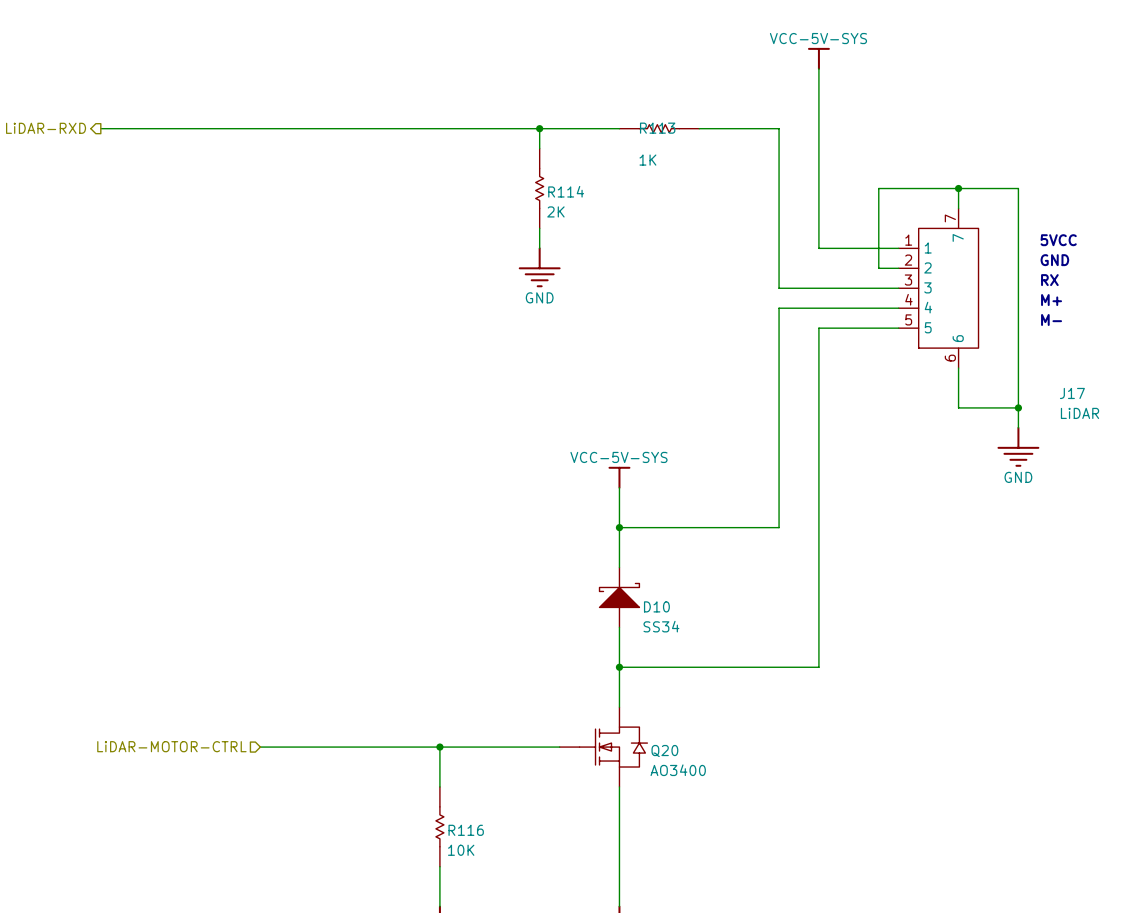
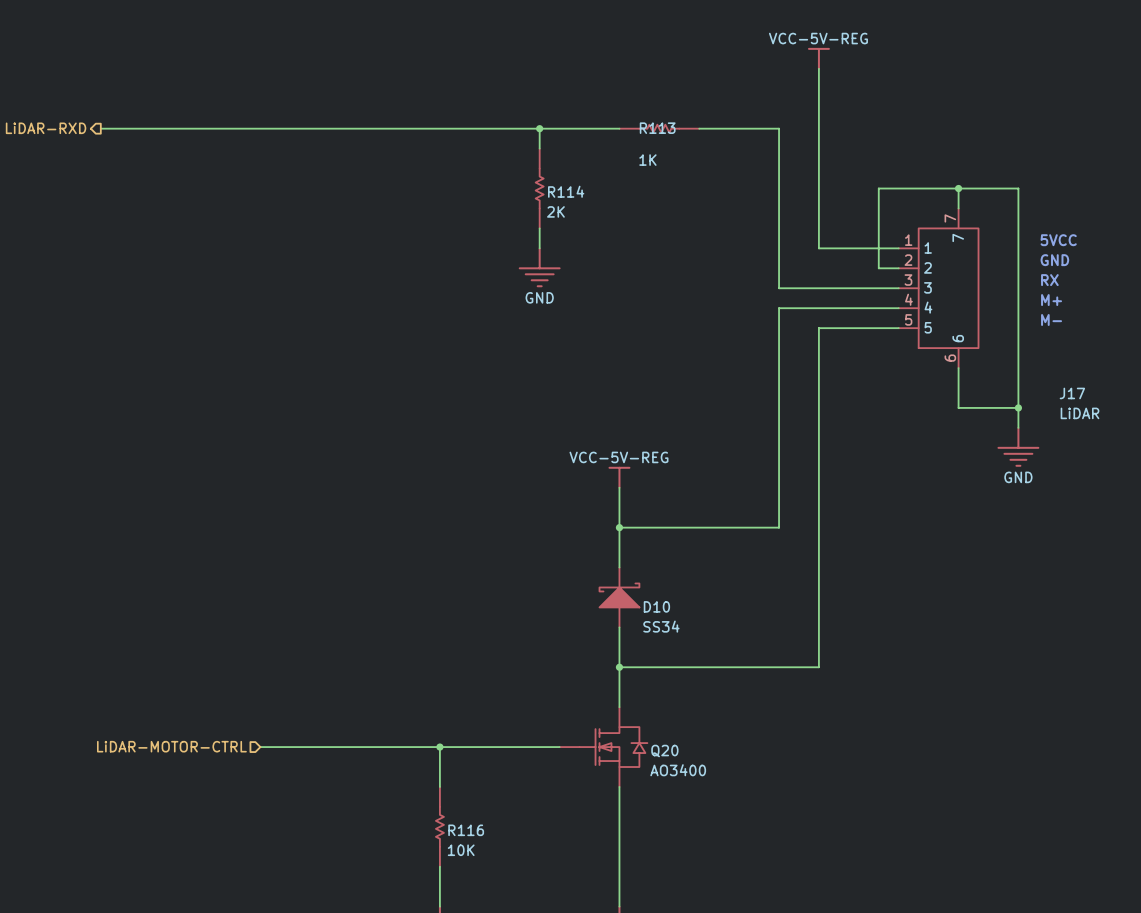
power symbol: VCC-5V-SYS (818, 58) -> VCC-5V-REG (818, 58)
power symbol: VCC-5V-SYS (619, 477) -> VCC-5V-REG (619, 477)

